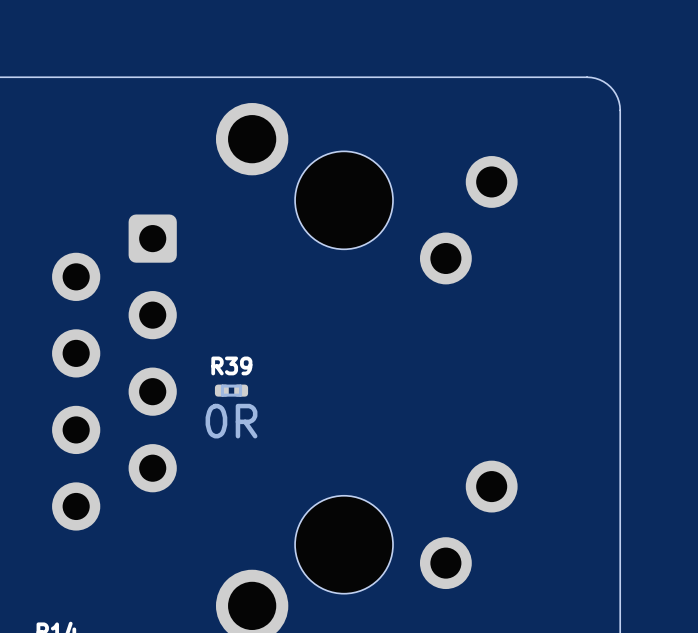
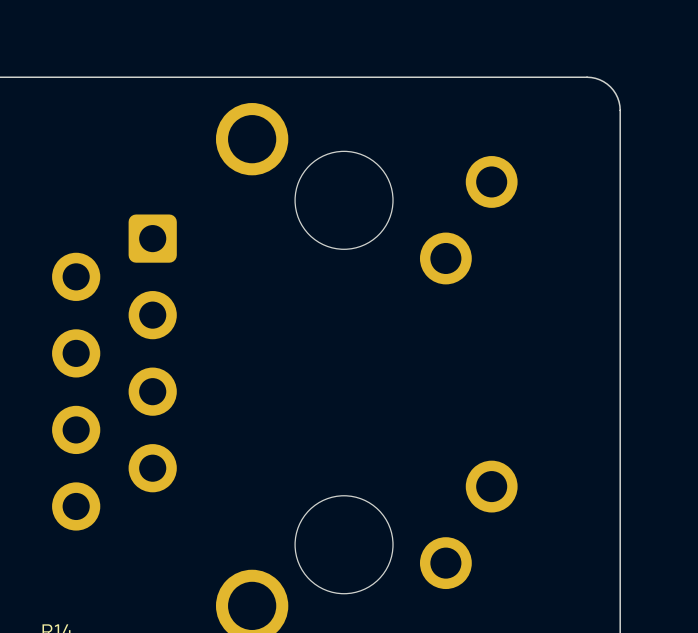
R39: 0R (231, 390) -> none

